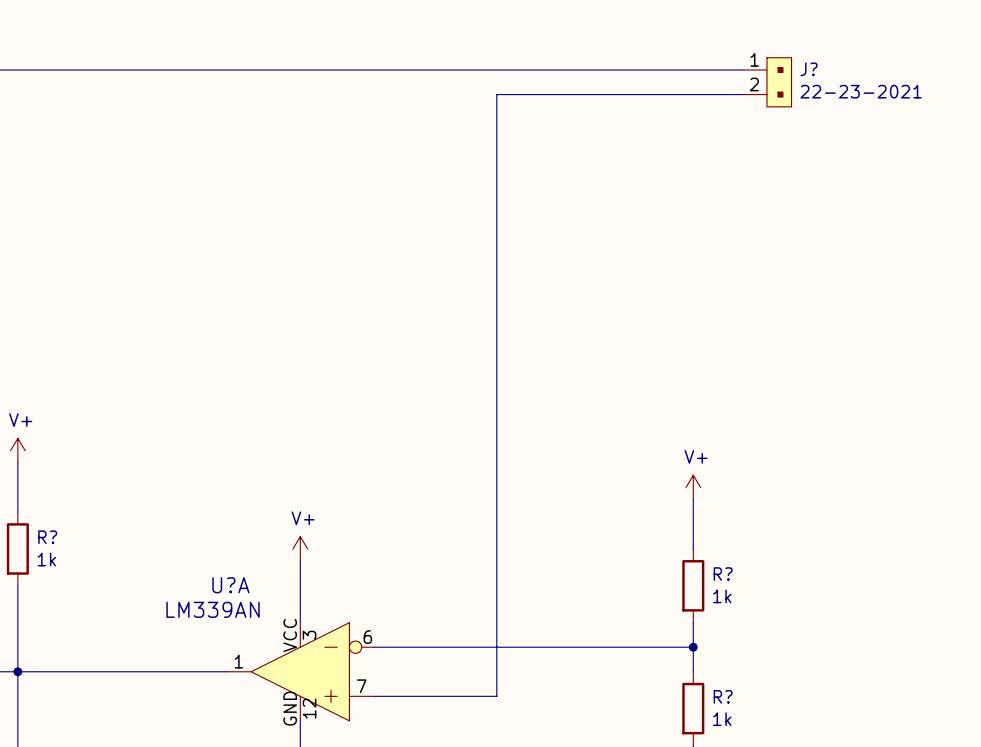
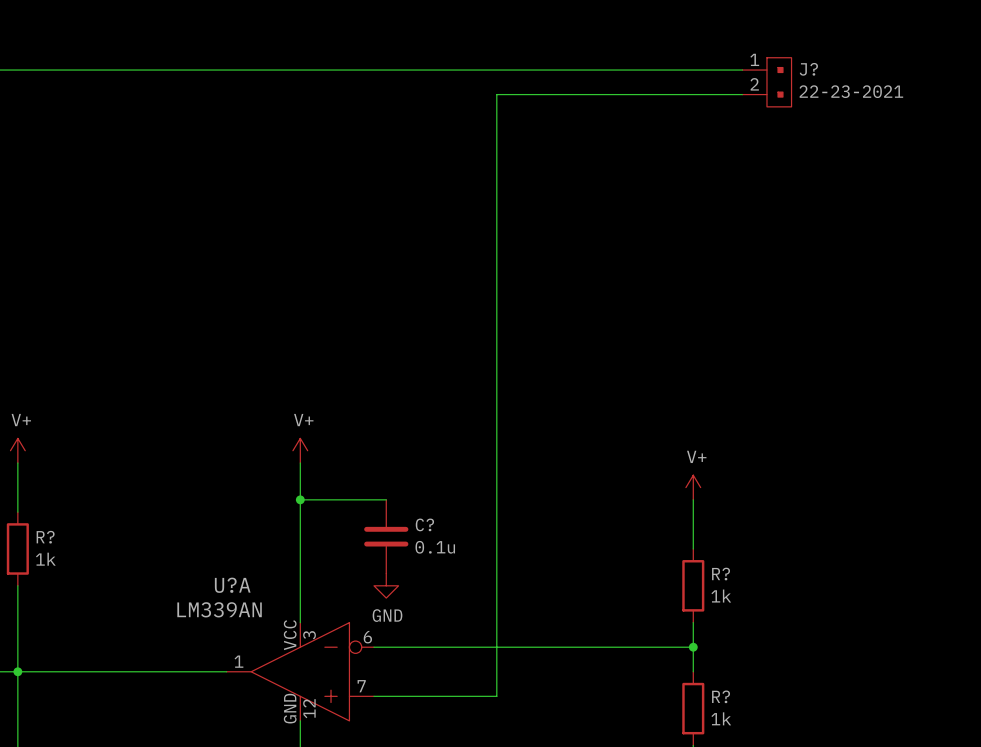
wire: none -> (300, 463) (300, 561)
wire: none -> (300, 499) (386, 499)
junction: none -> (300, 499)
C?: none -> 0.1u (386, 536)
power symbol position: V+ (300, 548) -> V+ (300, 450)
power symbol: none -> GND (386, 585)

